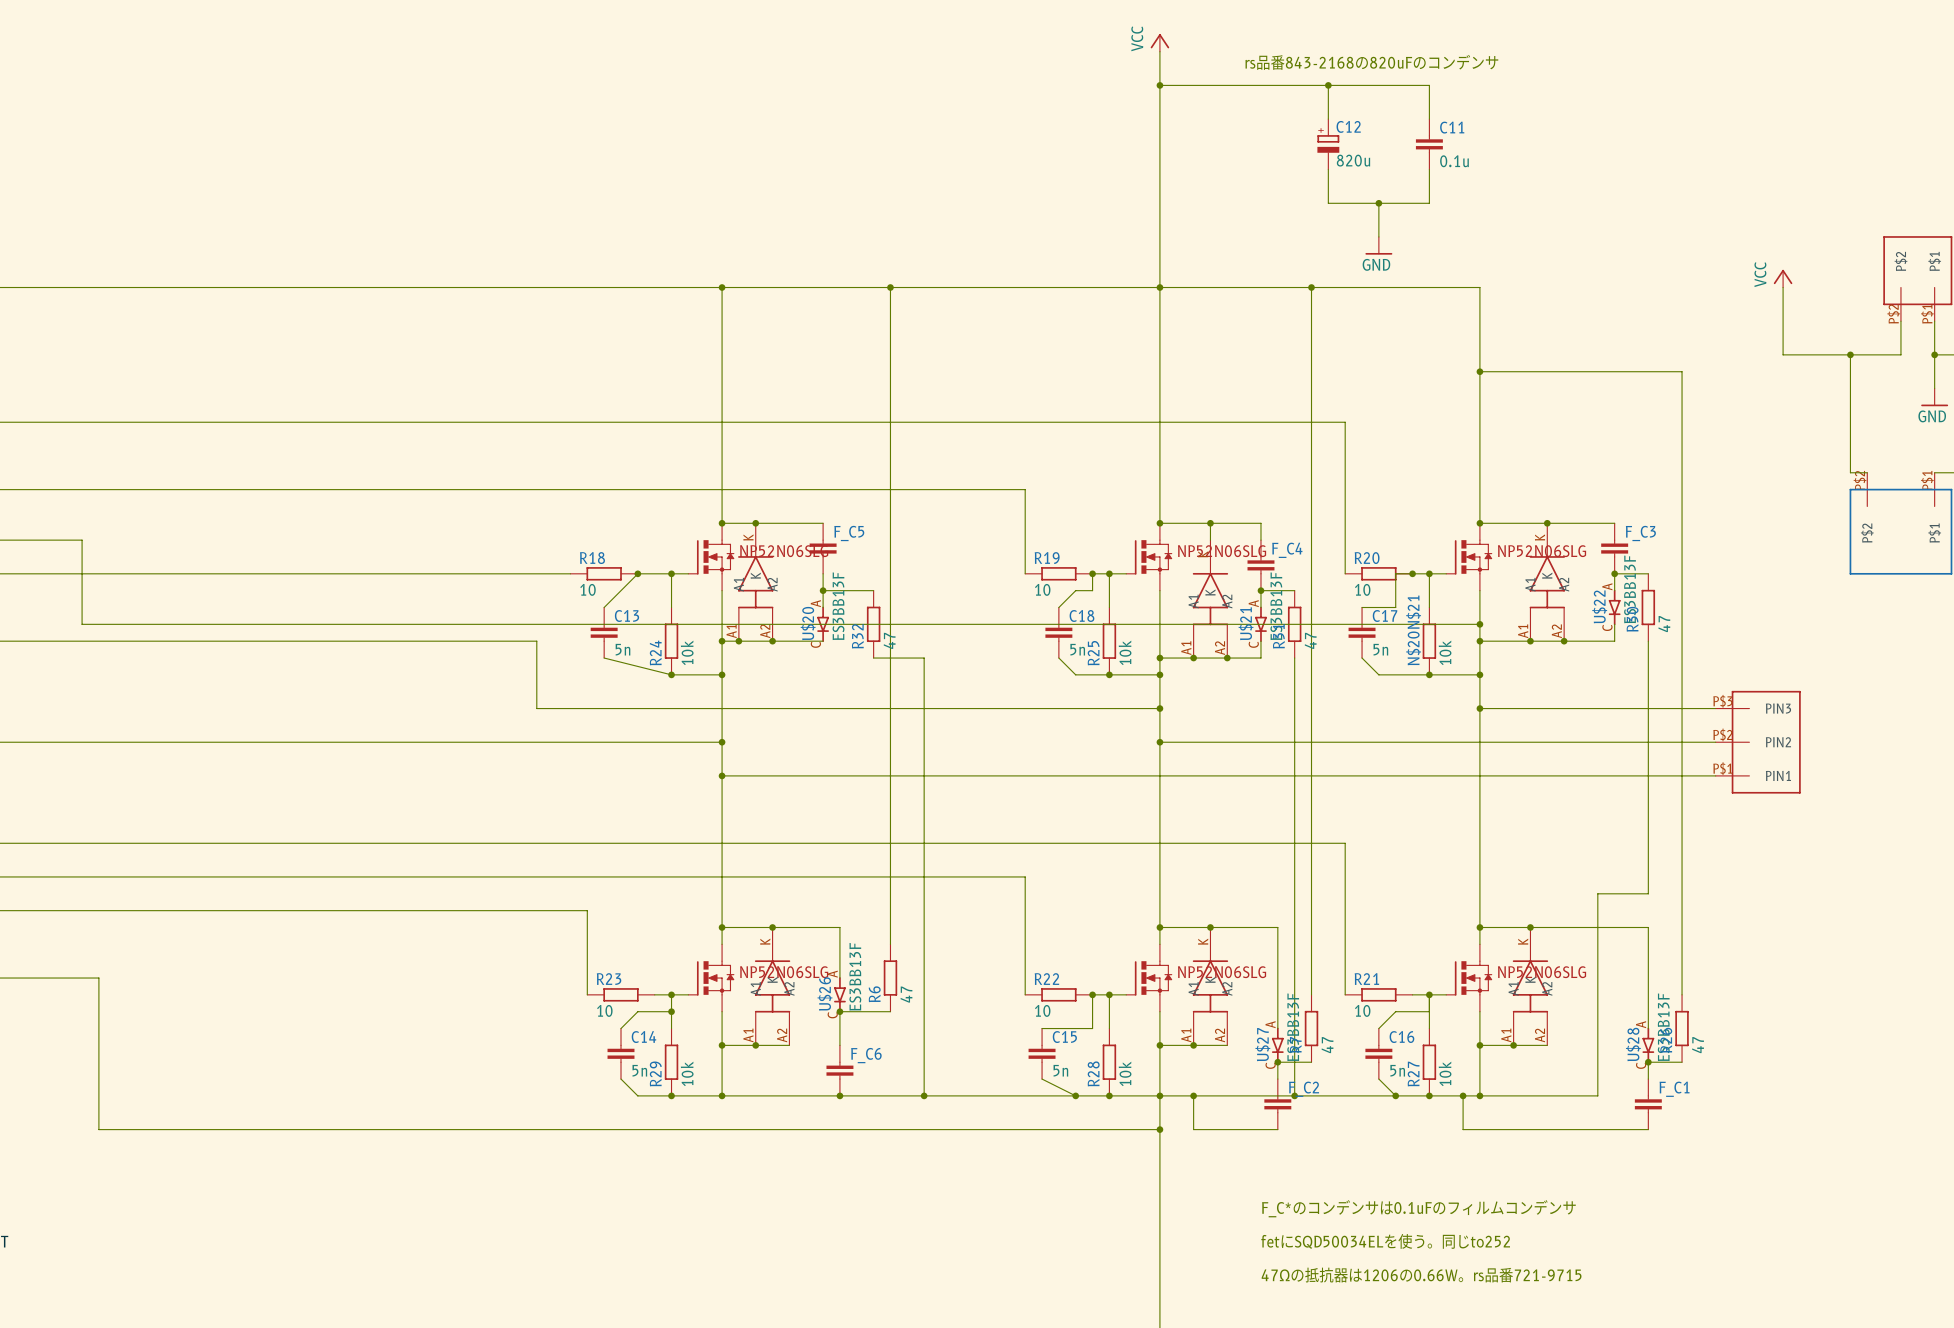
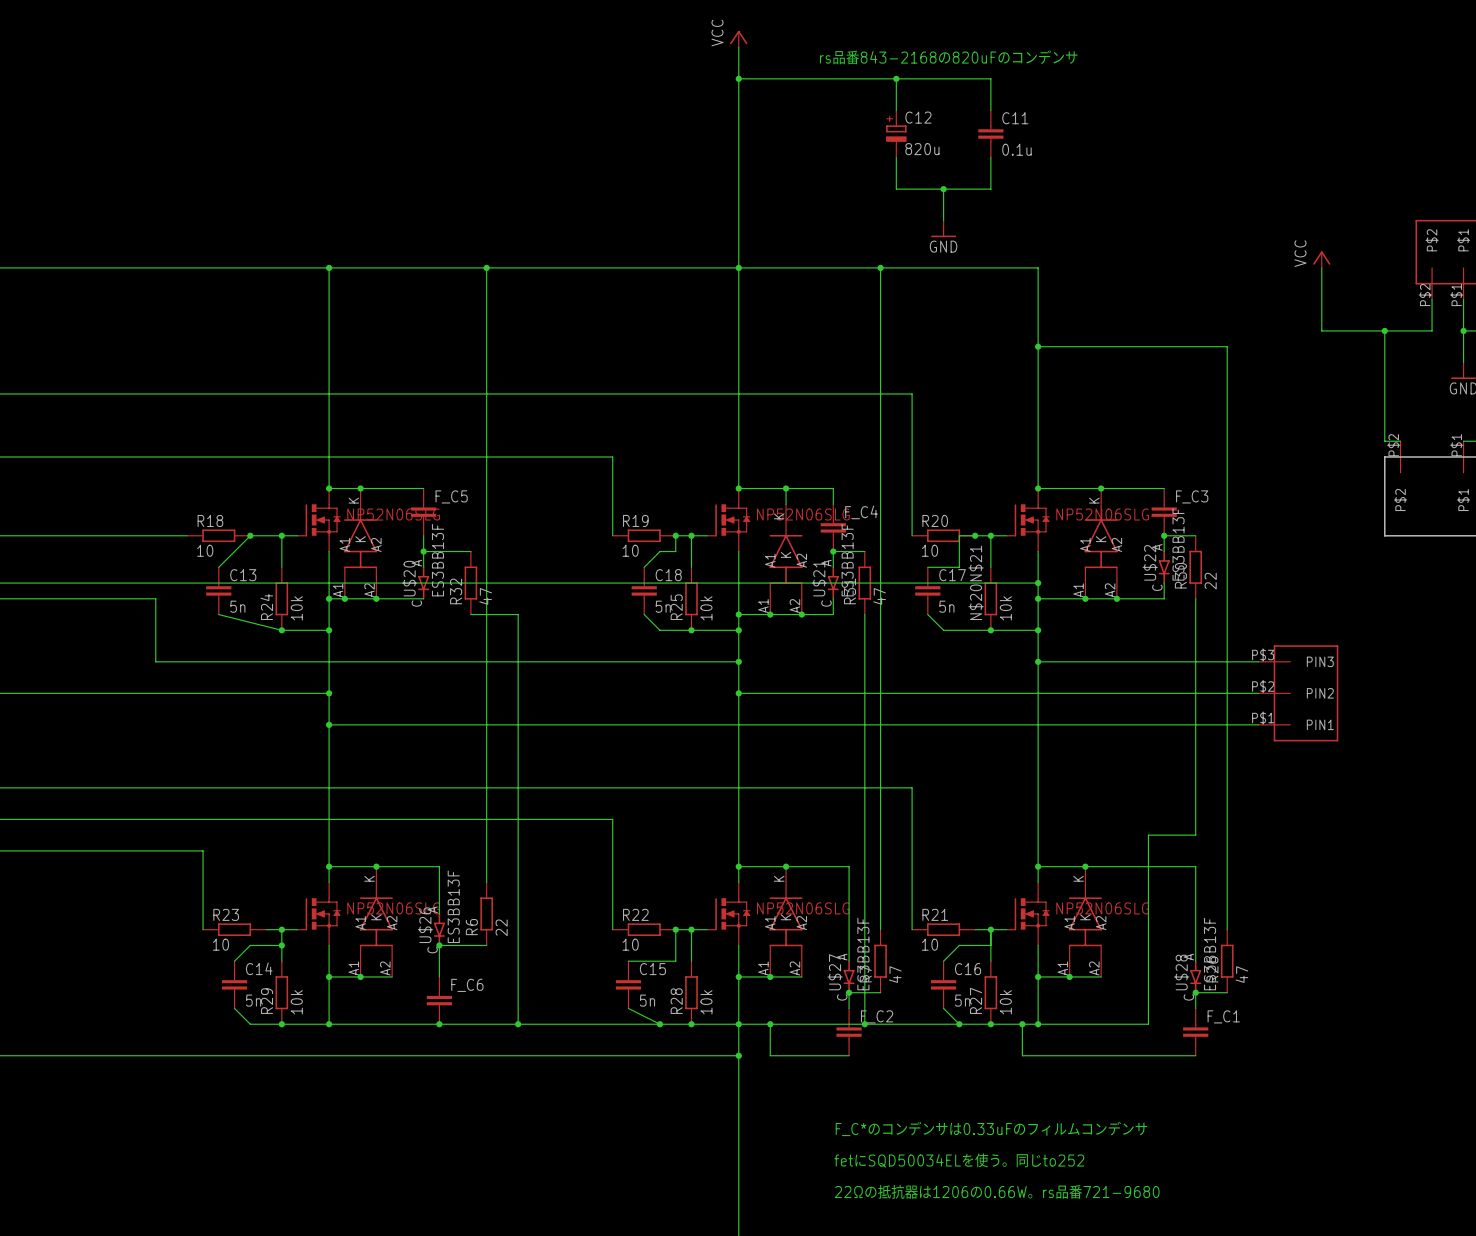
R30 value: 47 (1664, 624) -> 22 (1210, 581)
R6 value: 47 (906, 994) -> 22 (501, 927)
text: F_C*のコンデンサは0.1uFのフィルムコンデンサ (1418, 1208) -> F_C*のコンデンサは0.33uFのフィルムコンデンサ (991, 1128)
text: 47Ωの抵抗器は1206の0.66W。rs品番721-9715 (1421, 1275) -> 22Ωの抵抗器は1206の0.66W。rs品番721-9680 (997, 1191)

